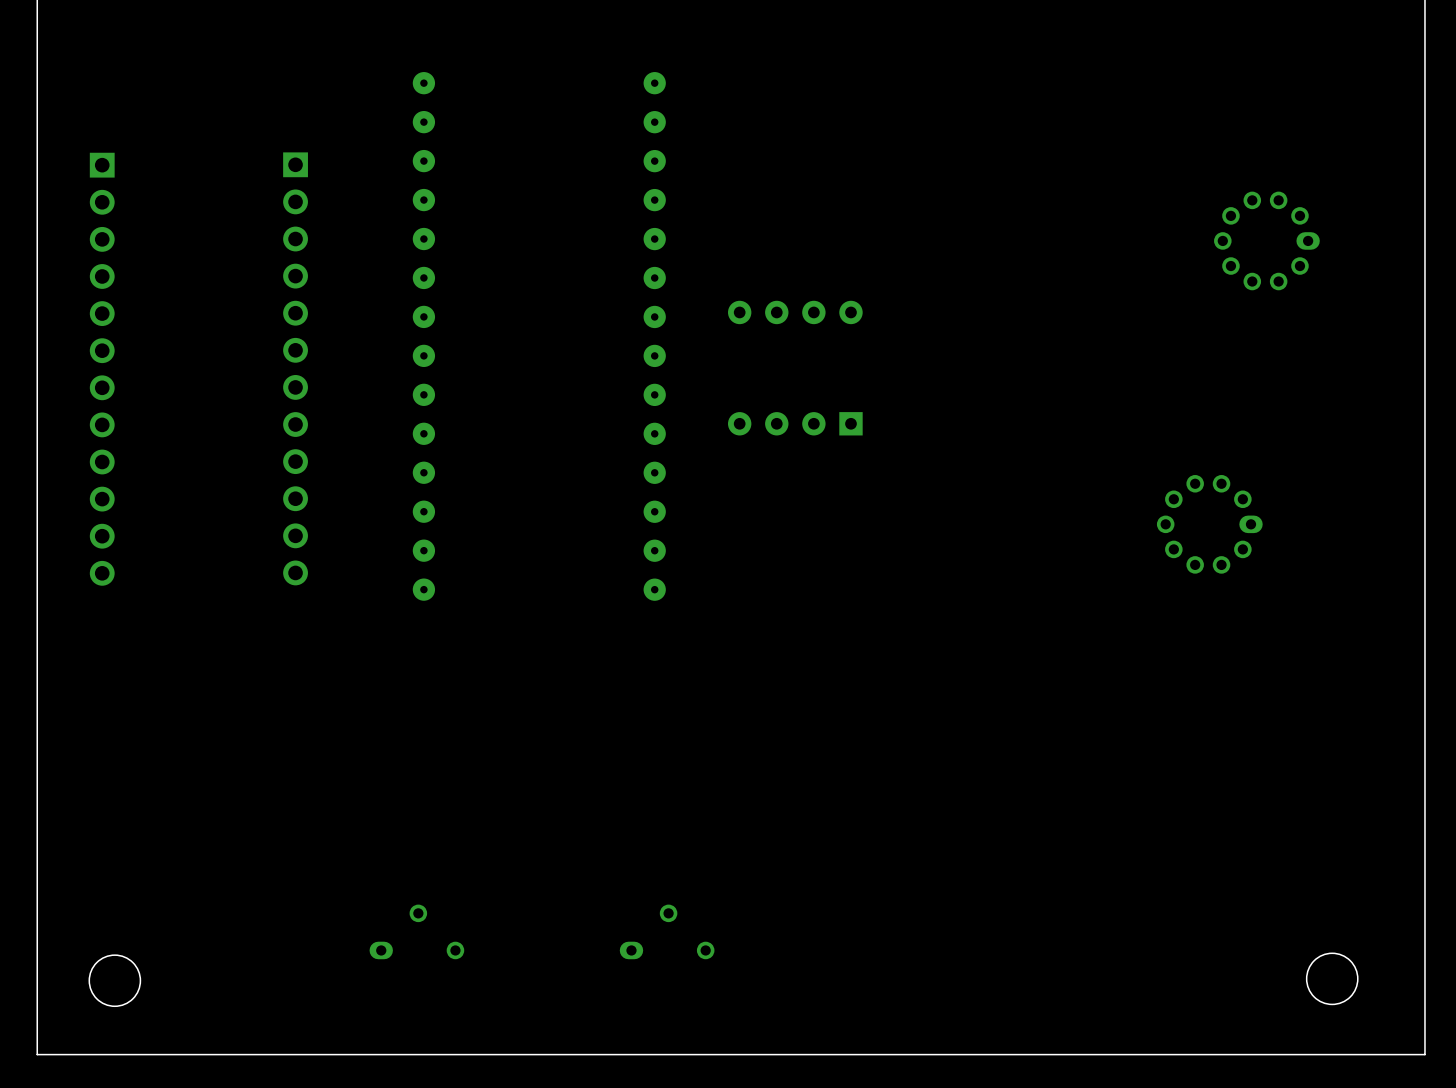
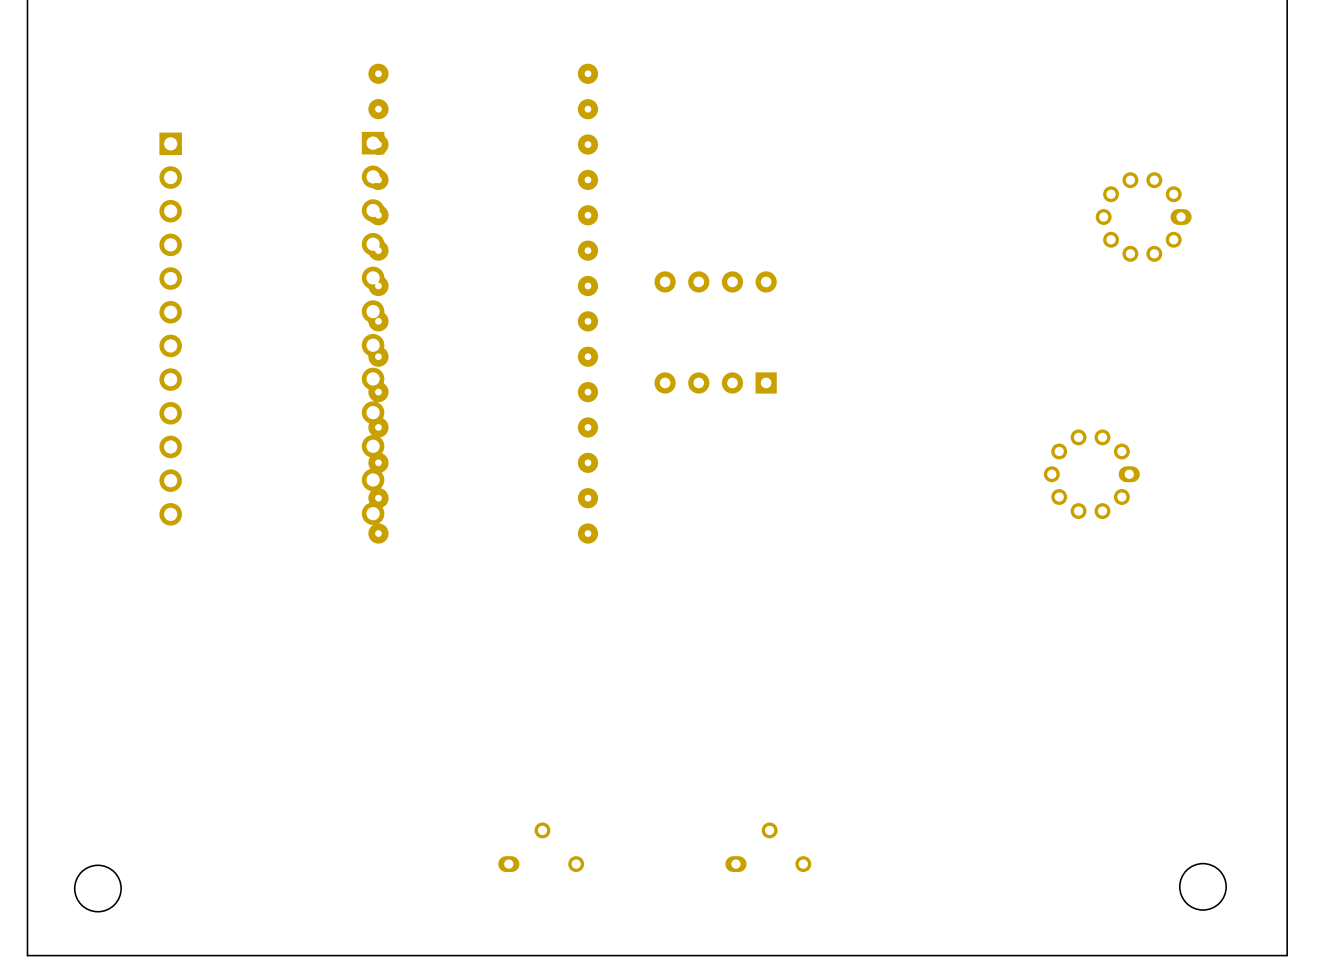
part: none -> (373, 328)
part: none -> (170, 329)
part: (295, 368) -> none
part: (102, 369) -> none
part: (416, 931) -> none
part position: (667, 931) -> (541, 847)
part: none -> (768, 847)

